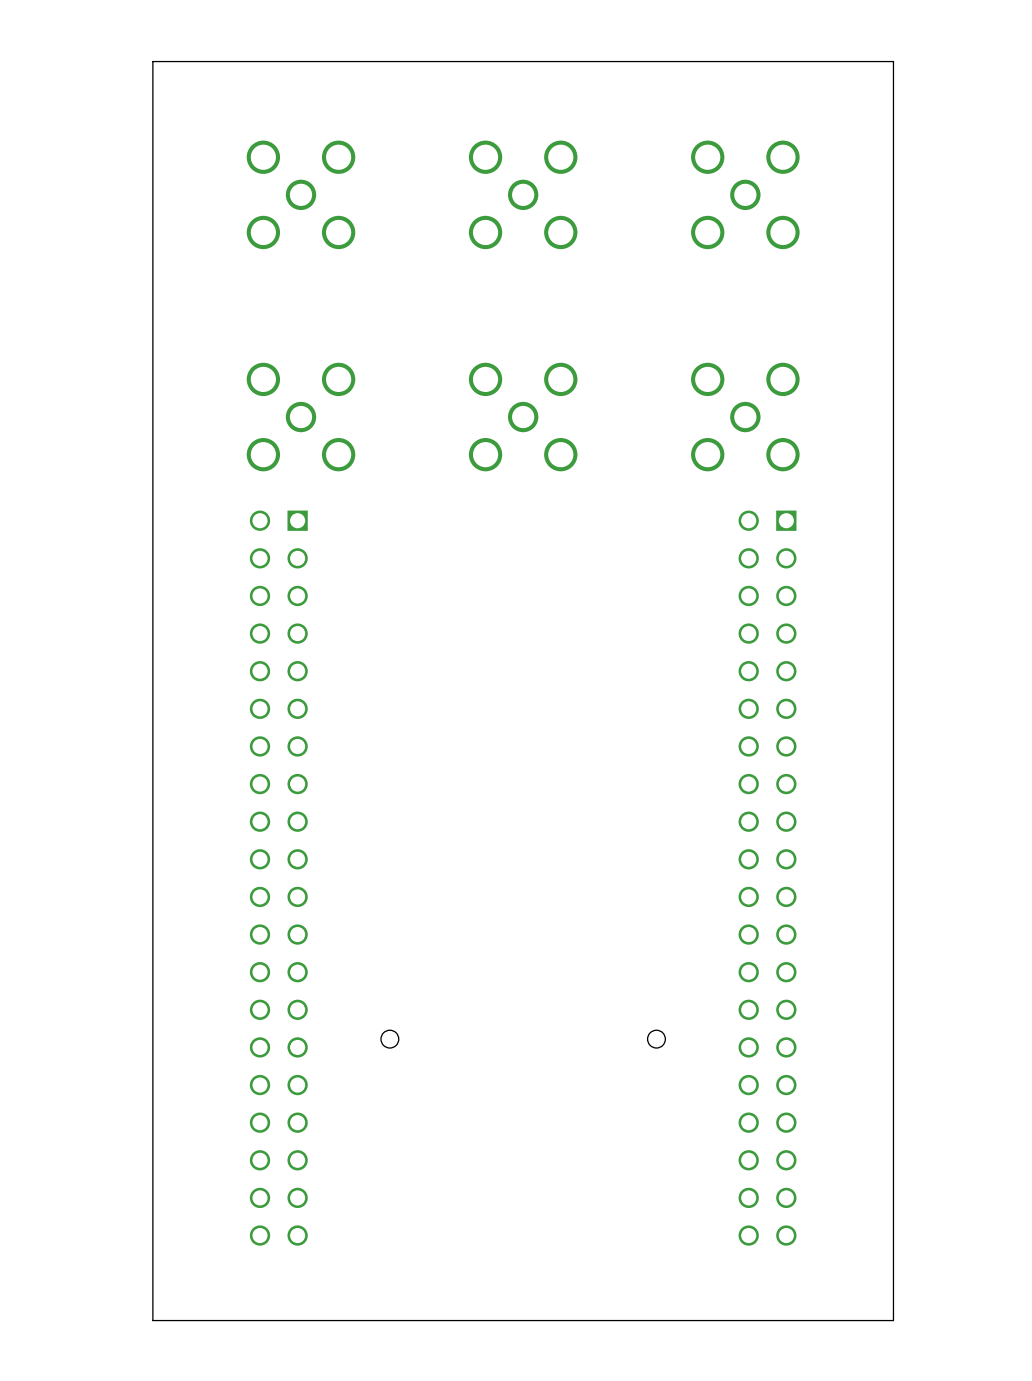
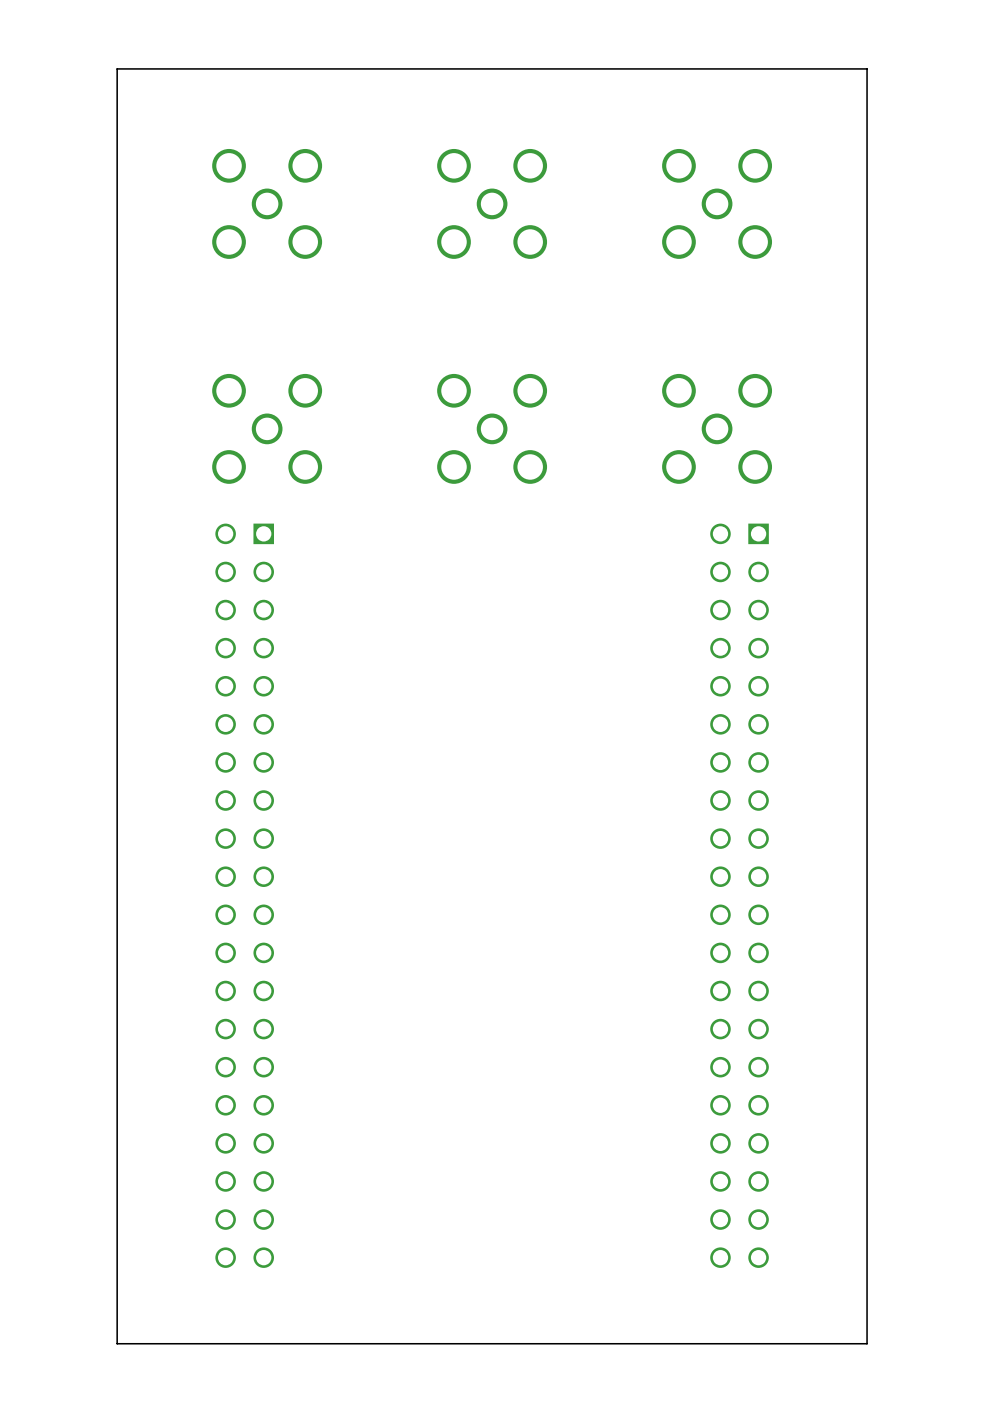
round board edge: [380, 1029, 400, 1049] -> none
round board edge: [647, 1029, 666, 1049] -> none

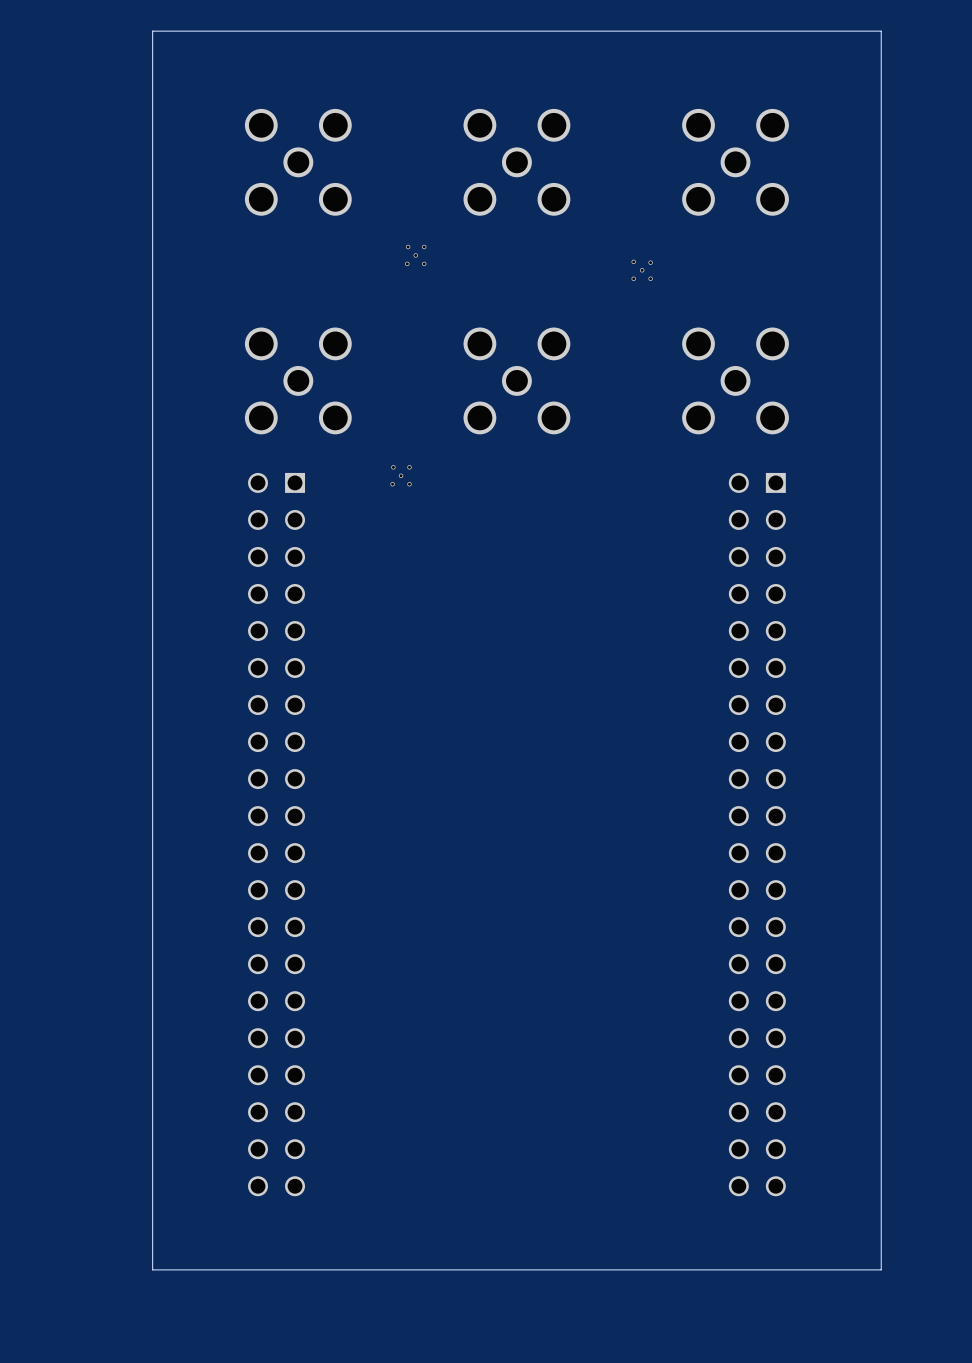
part: none -> (415, 255)
part: none -> (642, 270)
part: none -> (401, 475)

